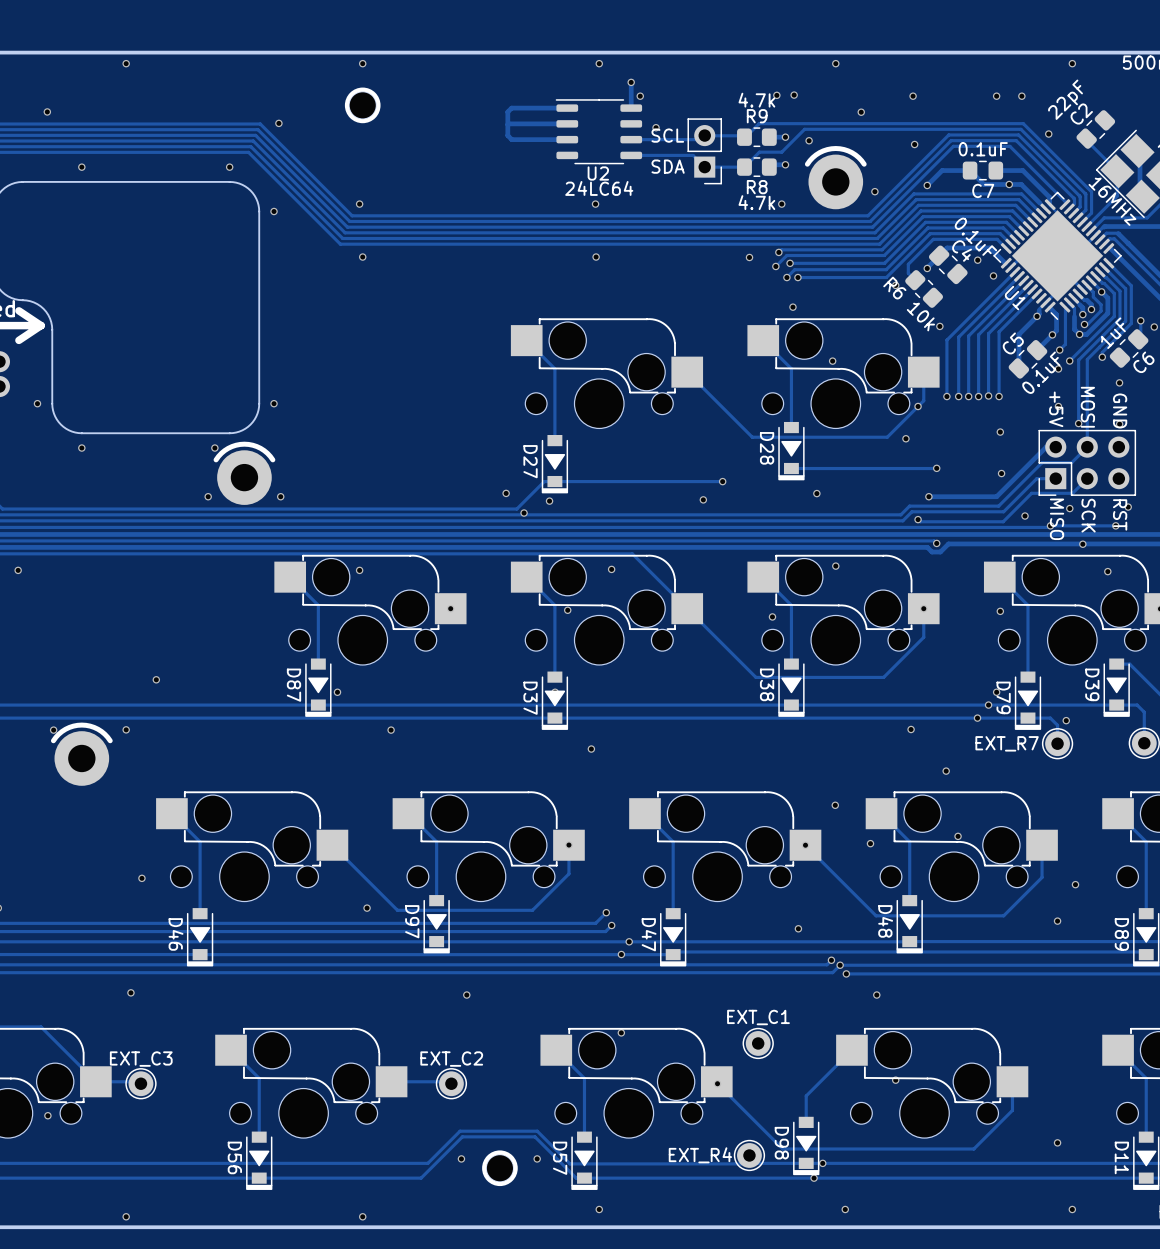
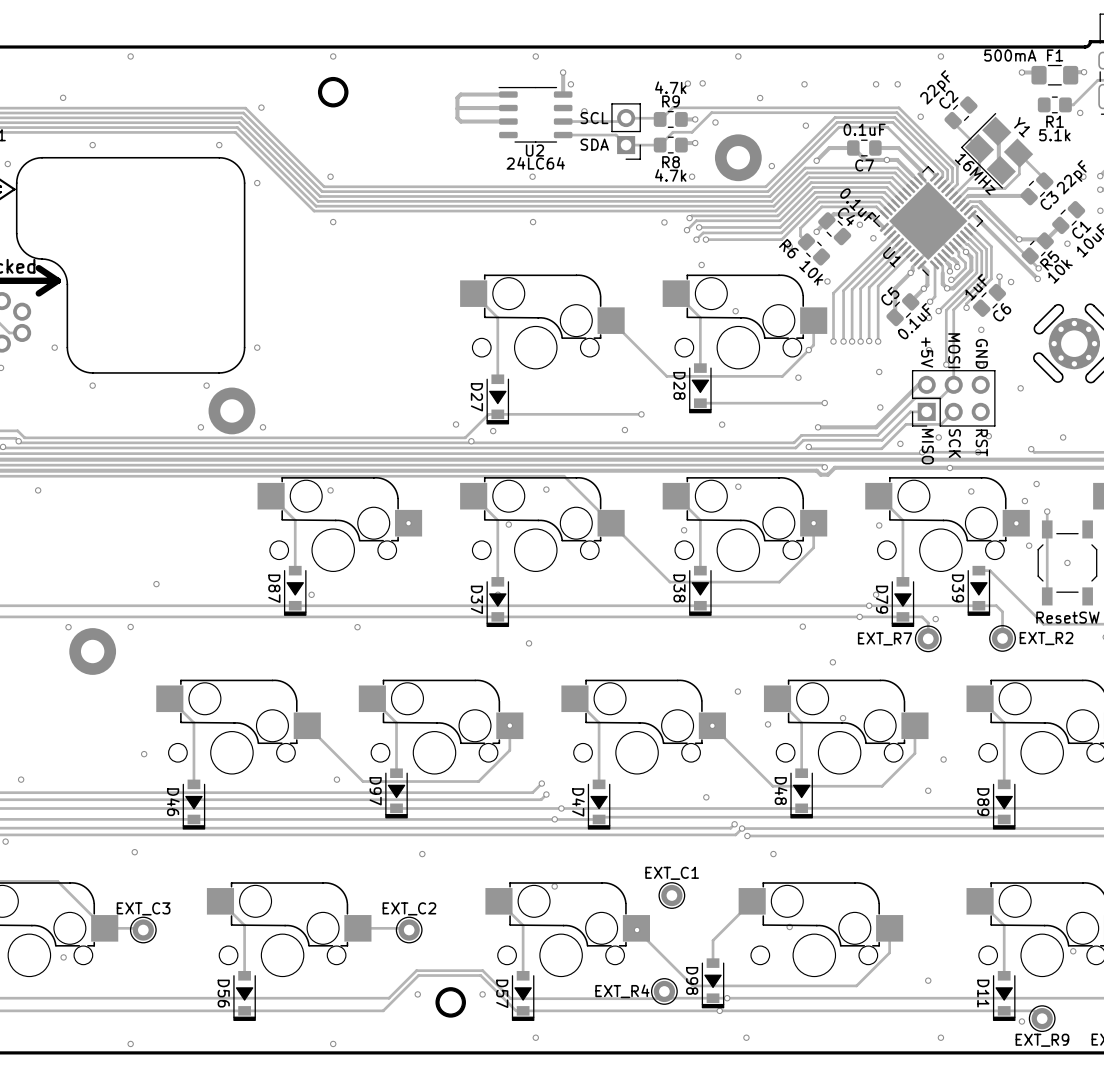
part side: bottom (835, 177) -> top (738, 157)
part side: bottom (244, 473) -> top (231, 410)
part side: bottom (81, 754) -> top (92, 651)

